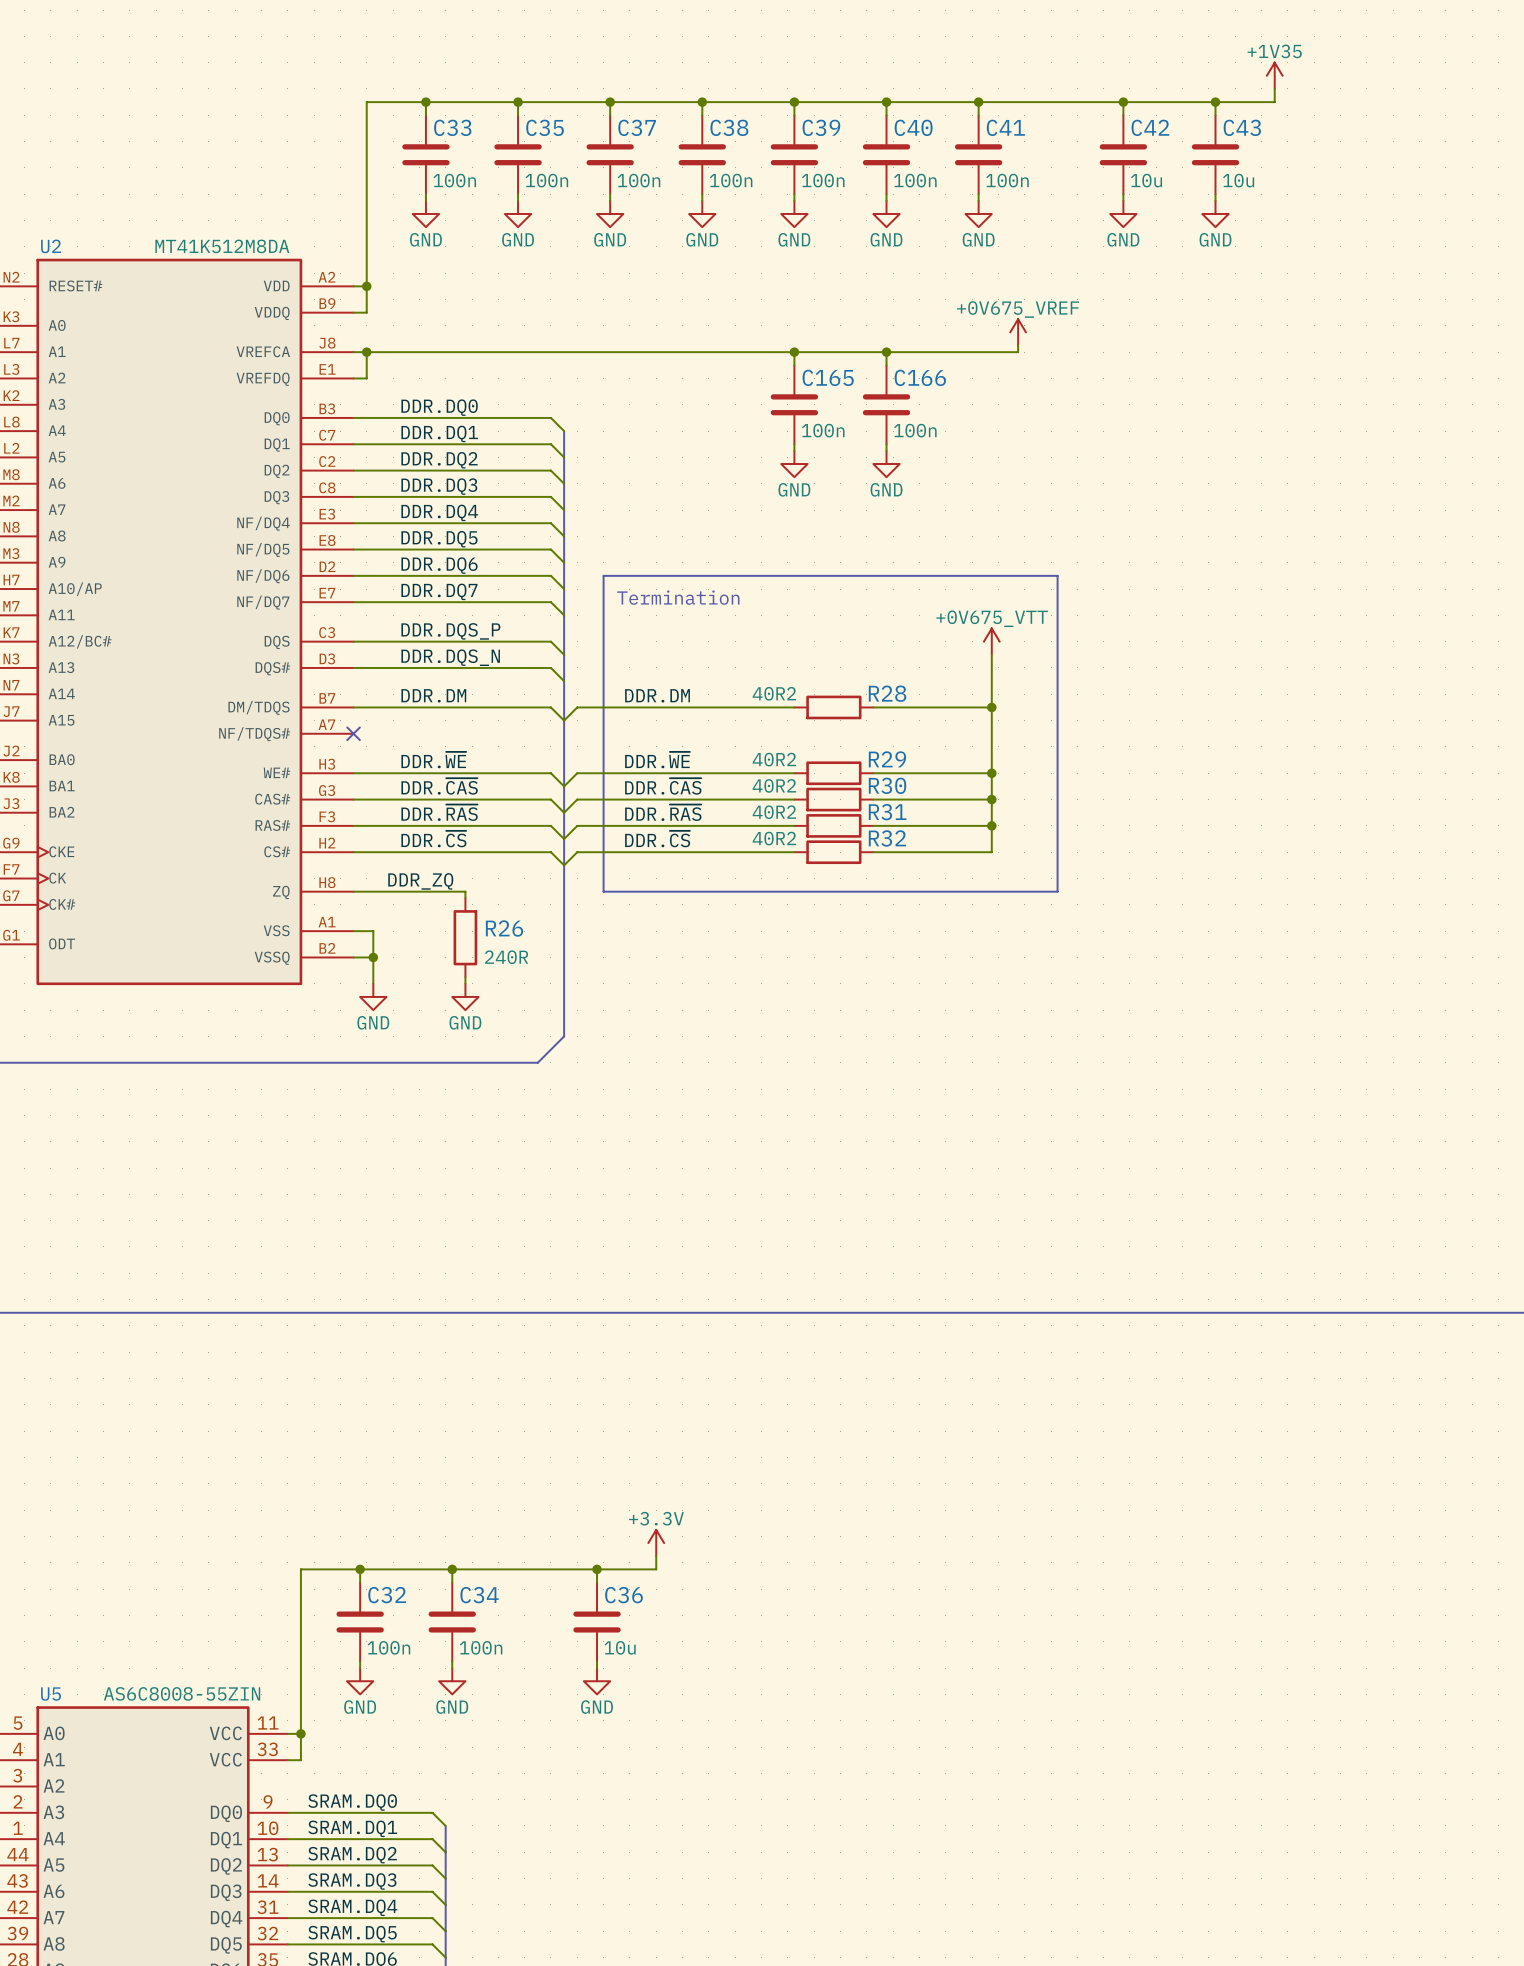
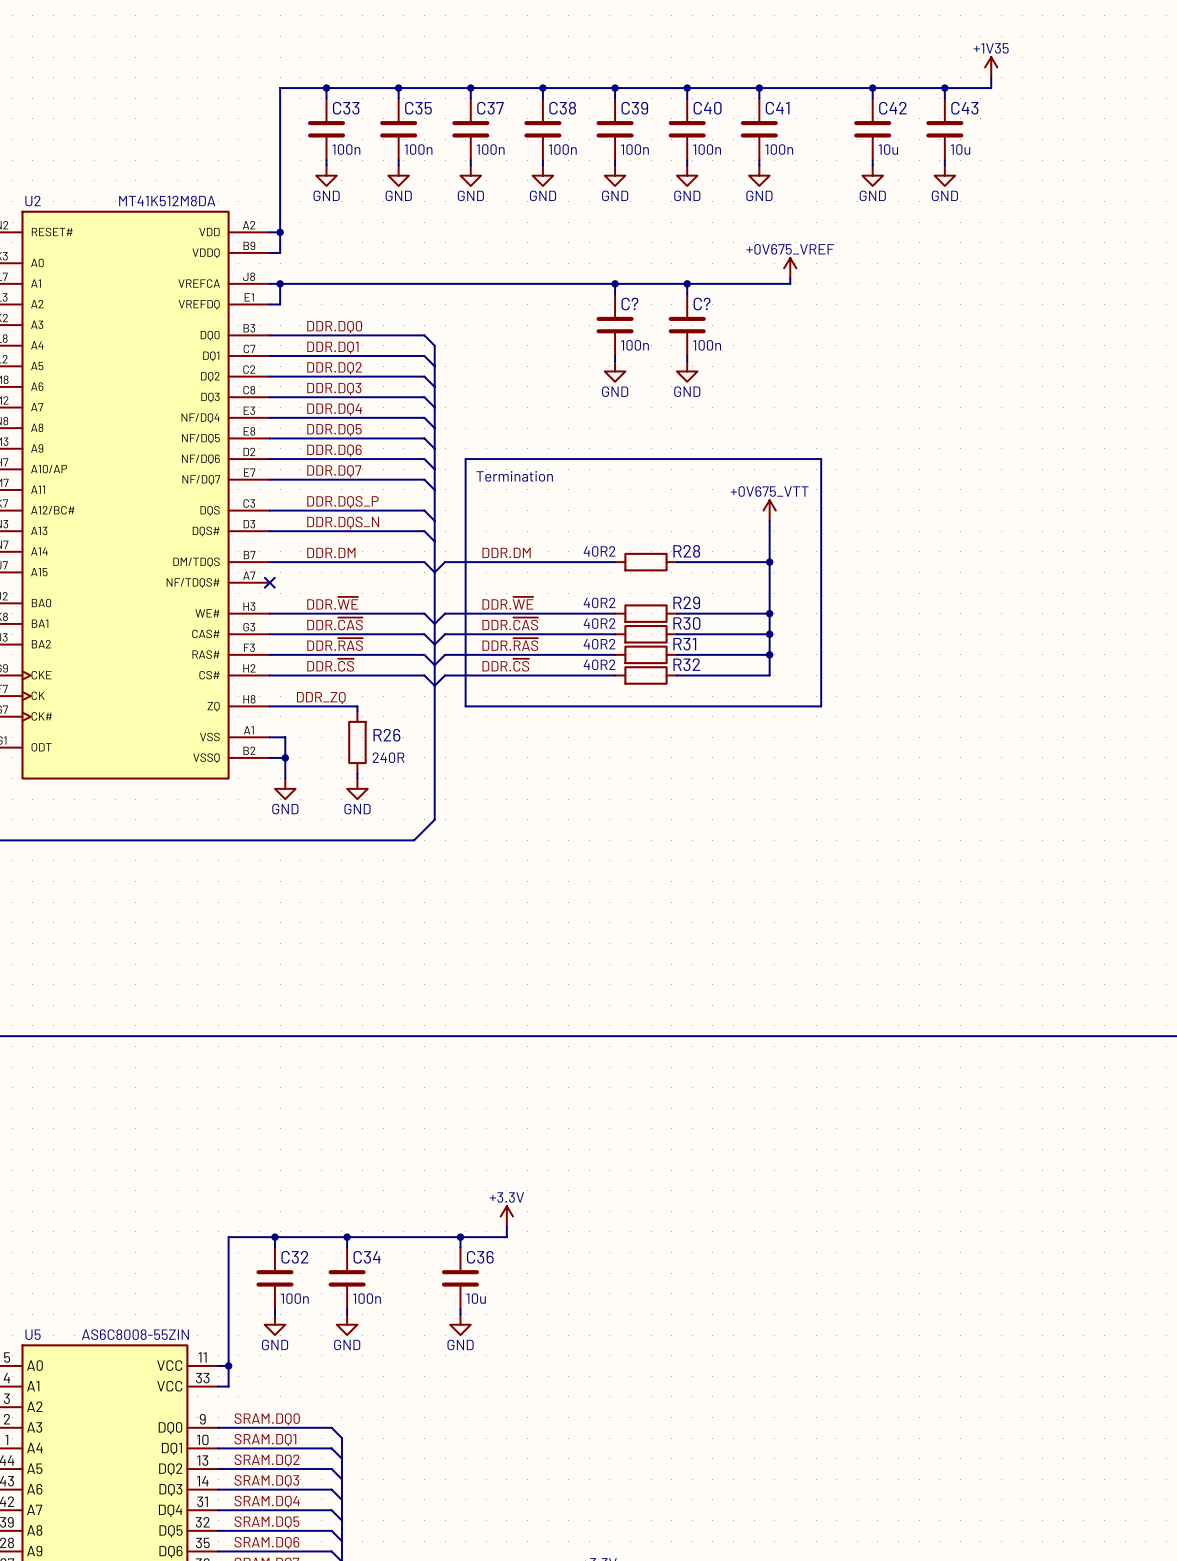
C165 name: C165 (828, 377) -> C? (629, 304)
C166 name: C166 (920, 377) -> C? (702, 304)

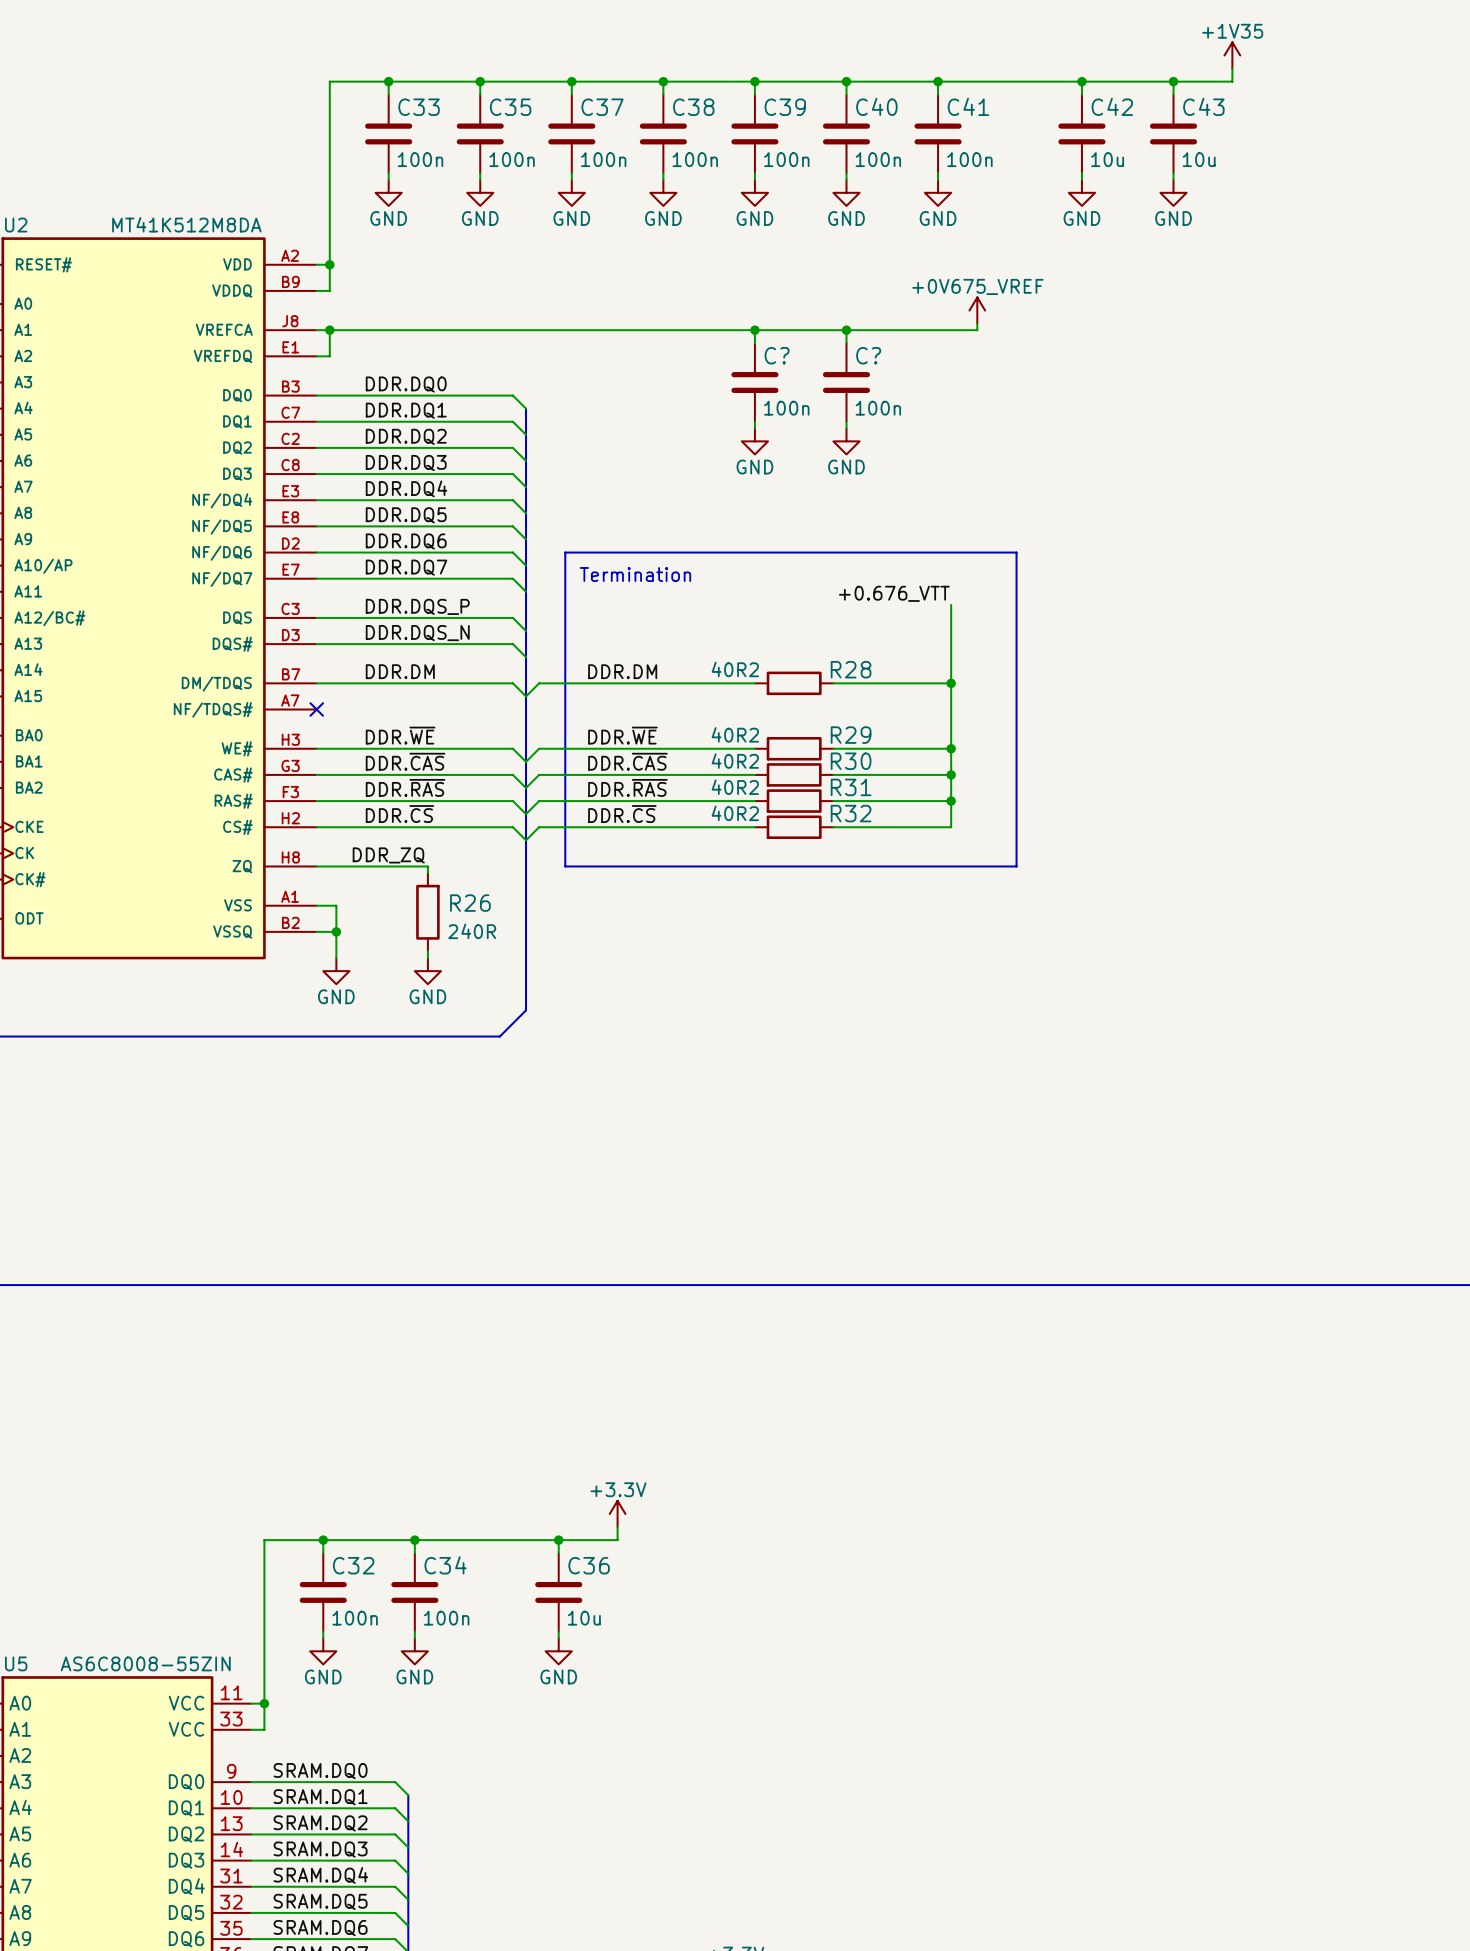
label: none -> +0.676_VTT (894, 593)
power symbol: +0V675_VTT (769, 510) -> none

